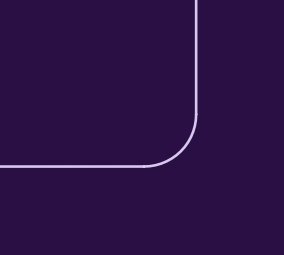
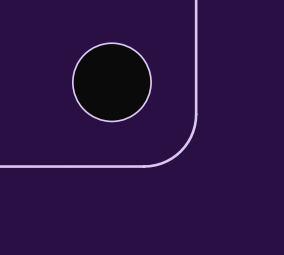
part: none -> (111, 82)

